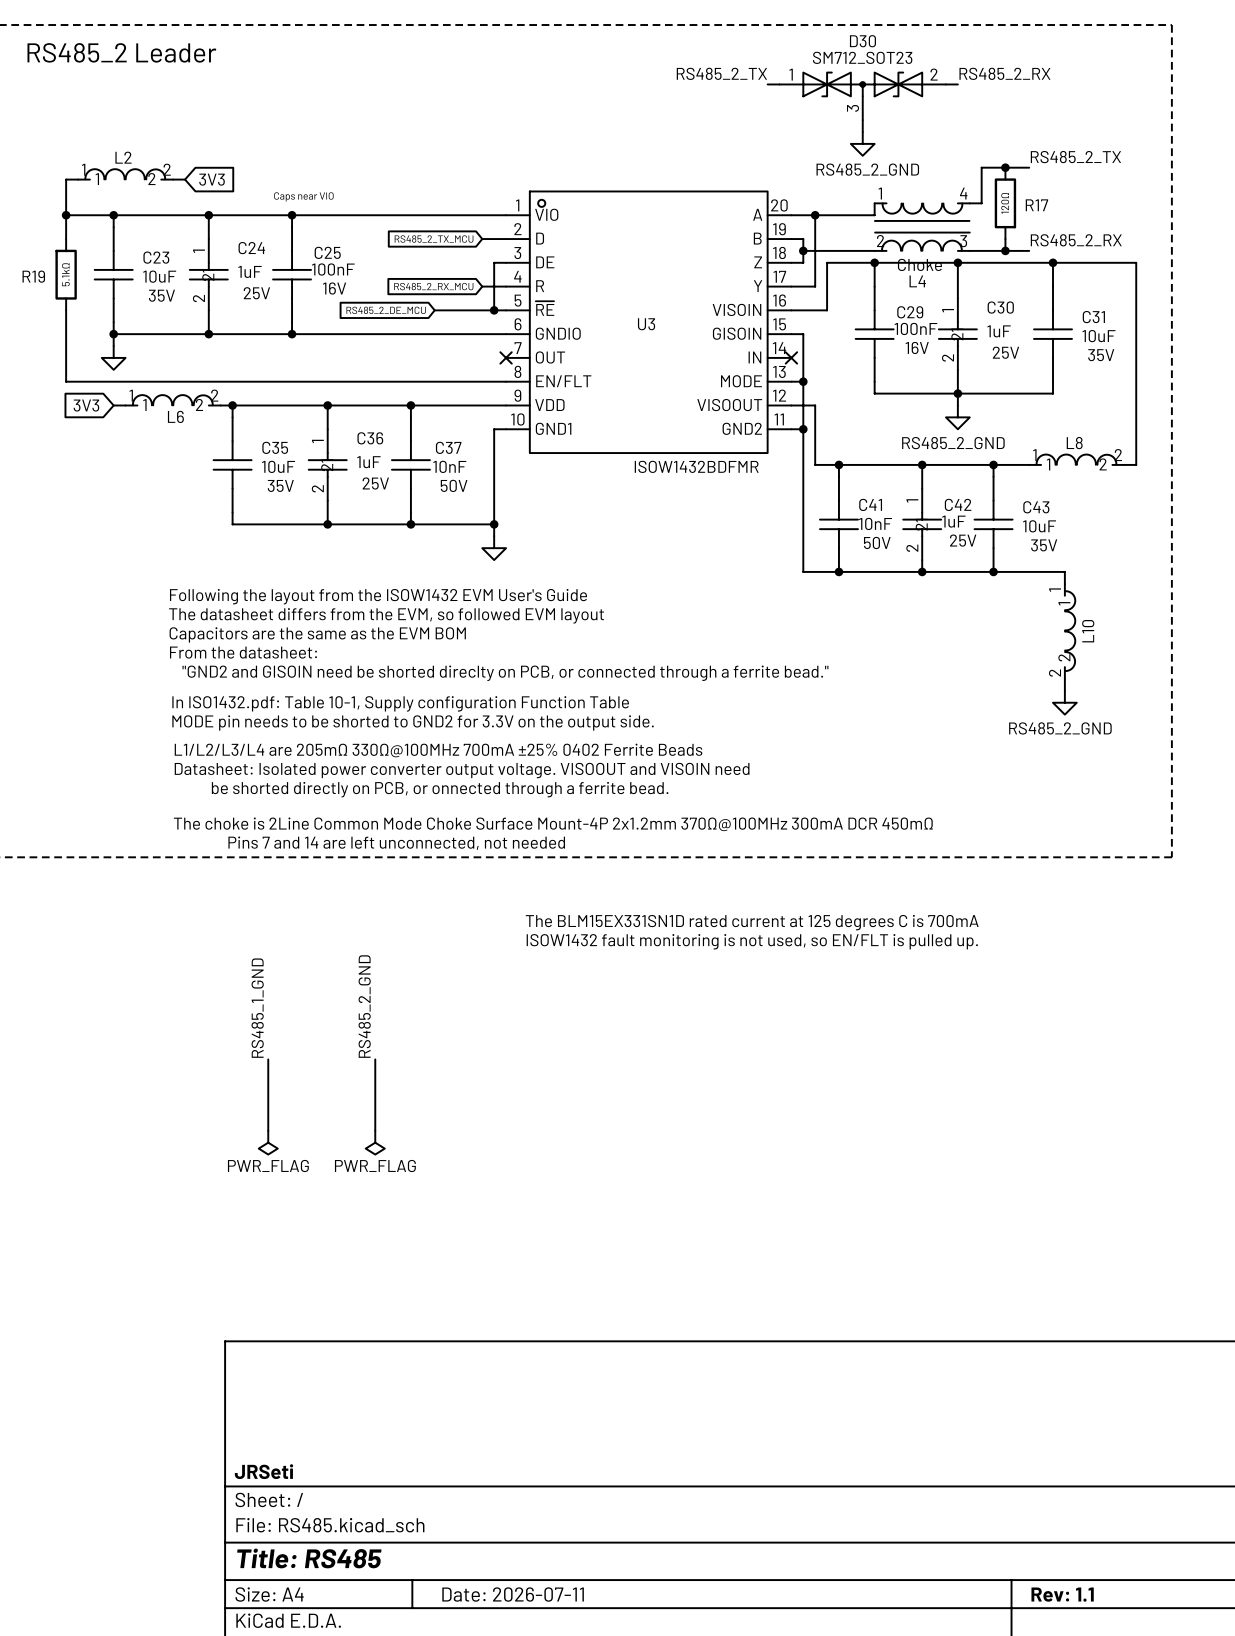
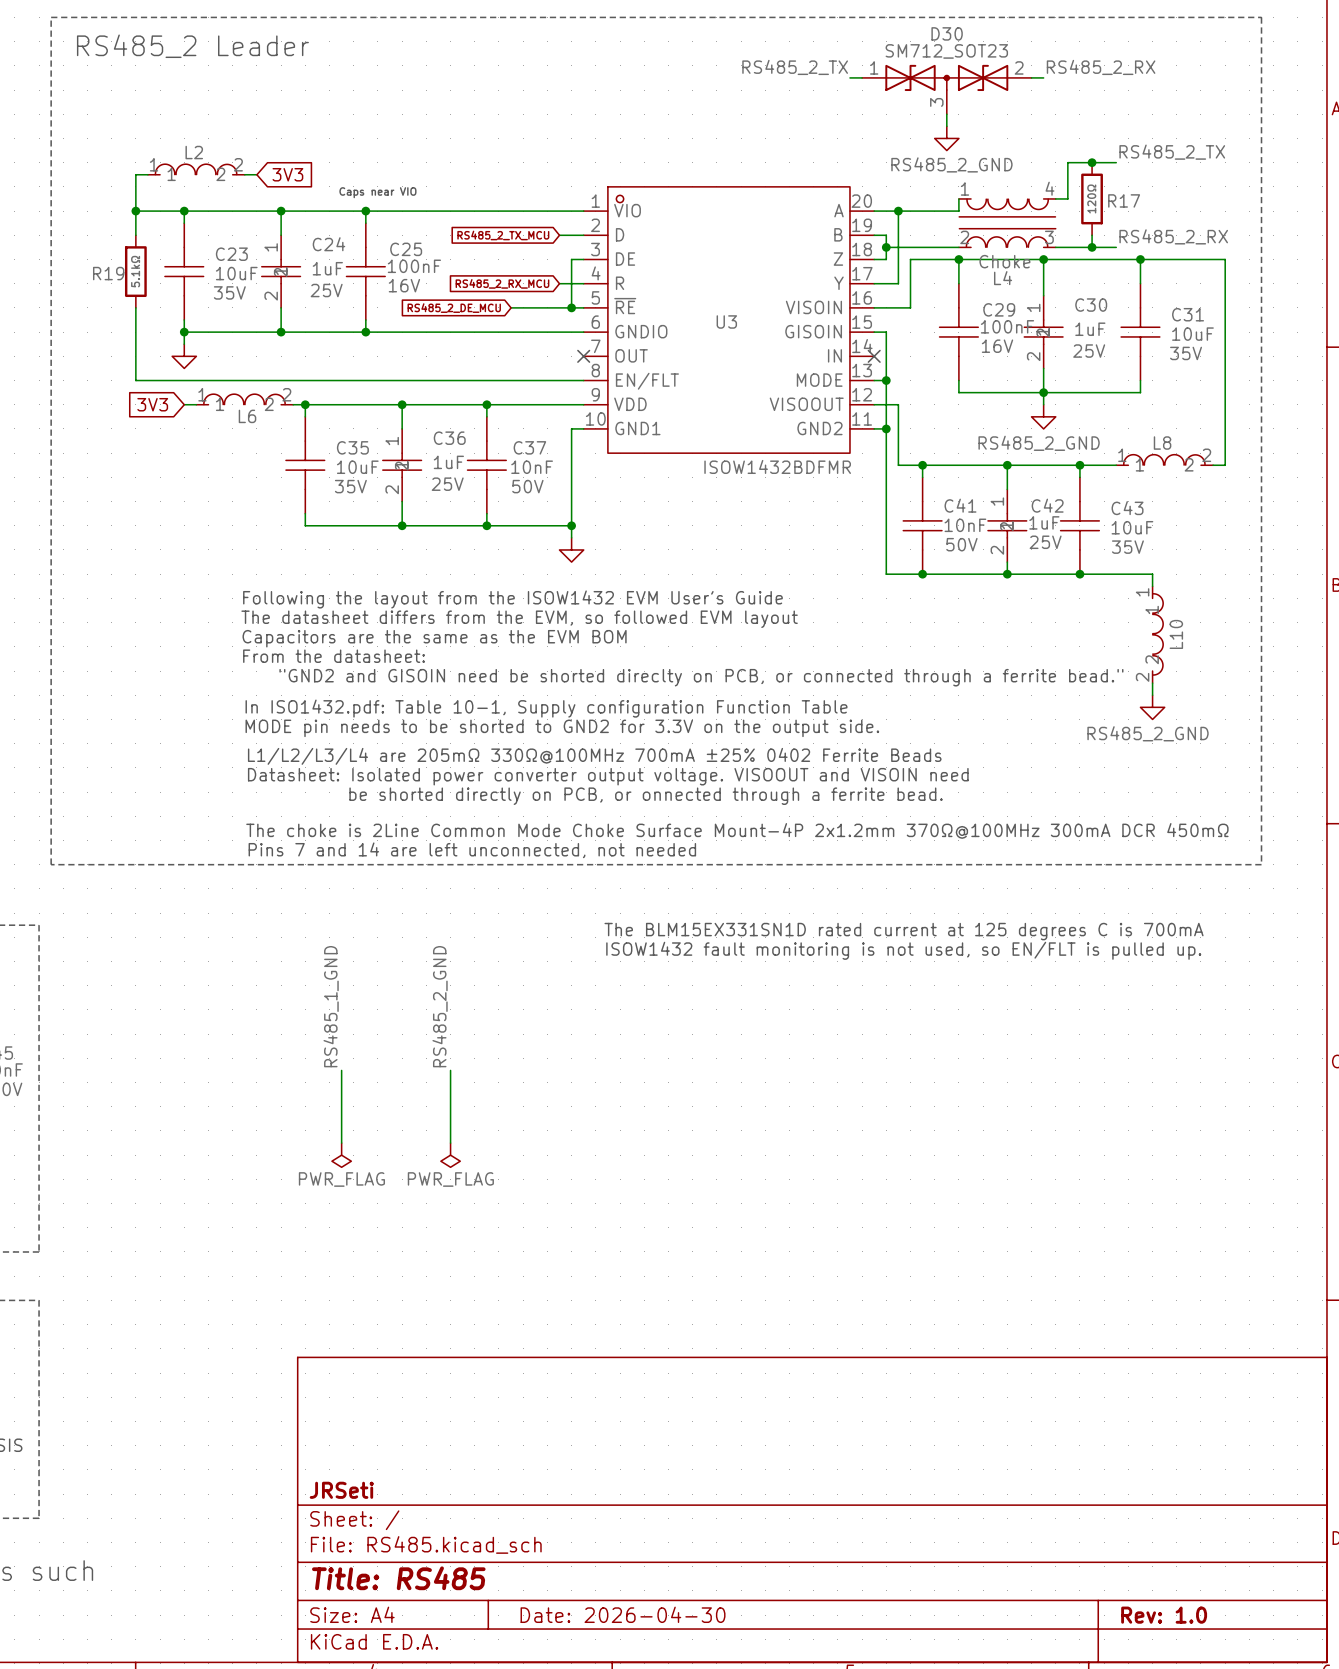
title block: Date: 2026-07-11 (513, 1594) -> Date: 2026-04-30 (623, 1614)
title block: Rev: 1.1 (1062, 1594) -> Rev: 1.0 (1164, 1615)

